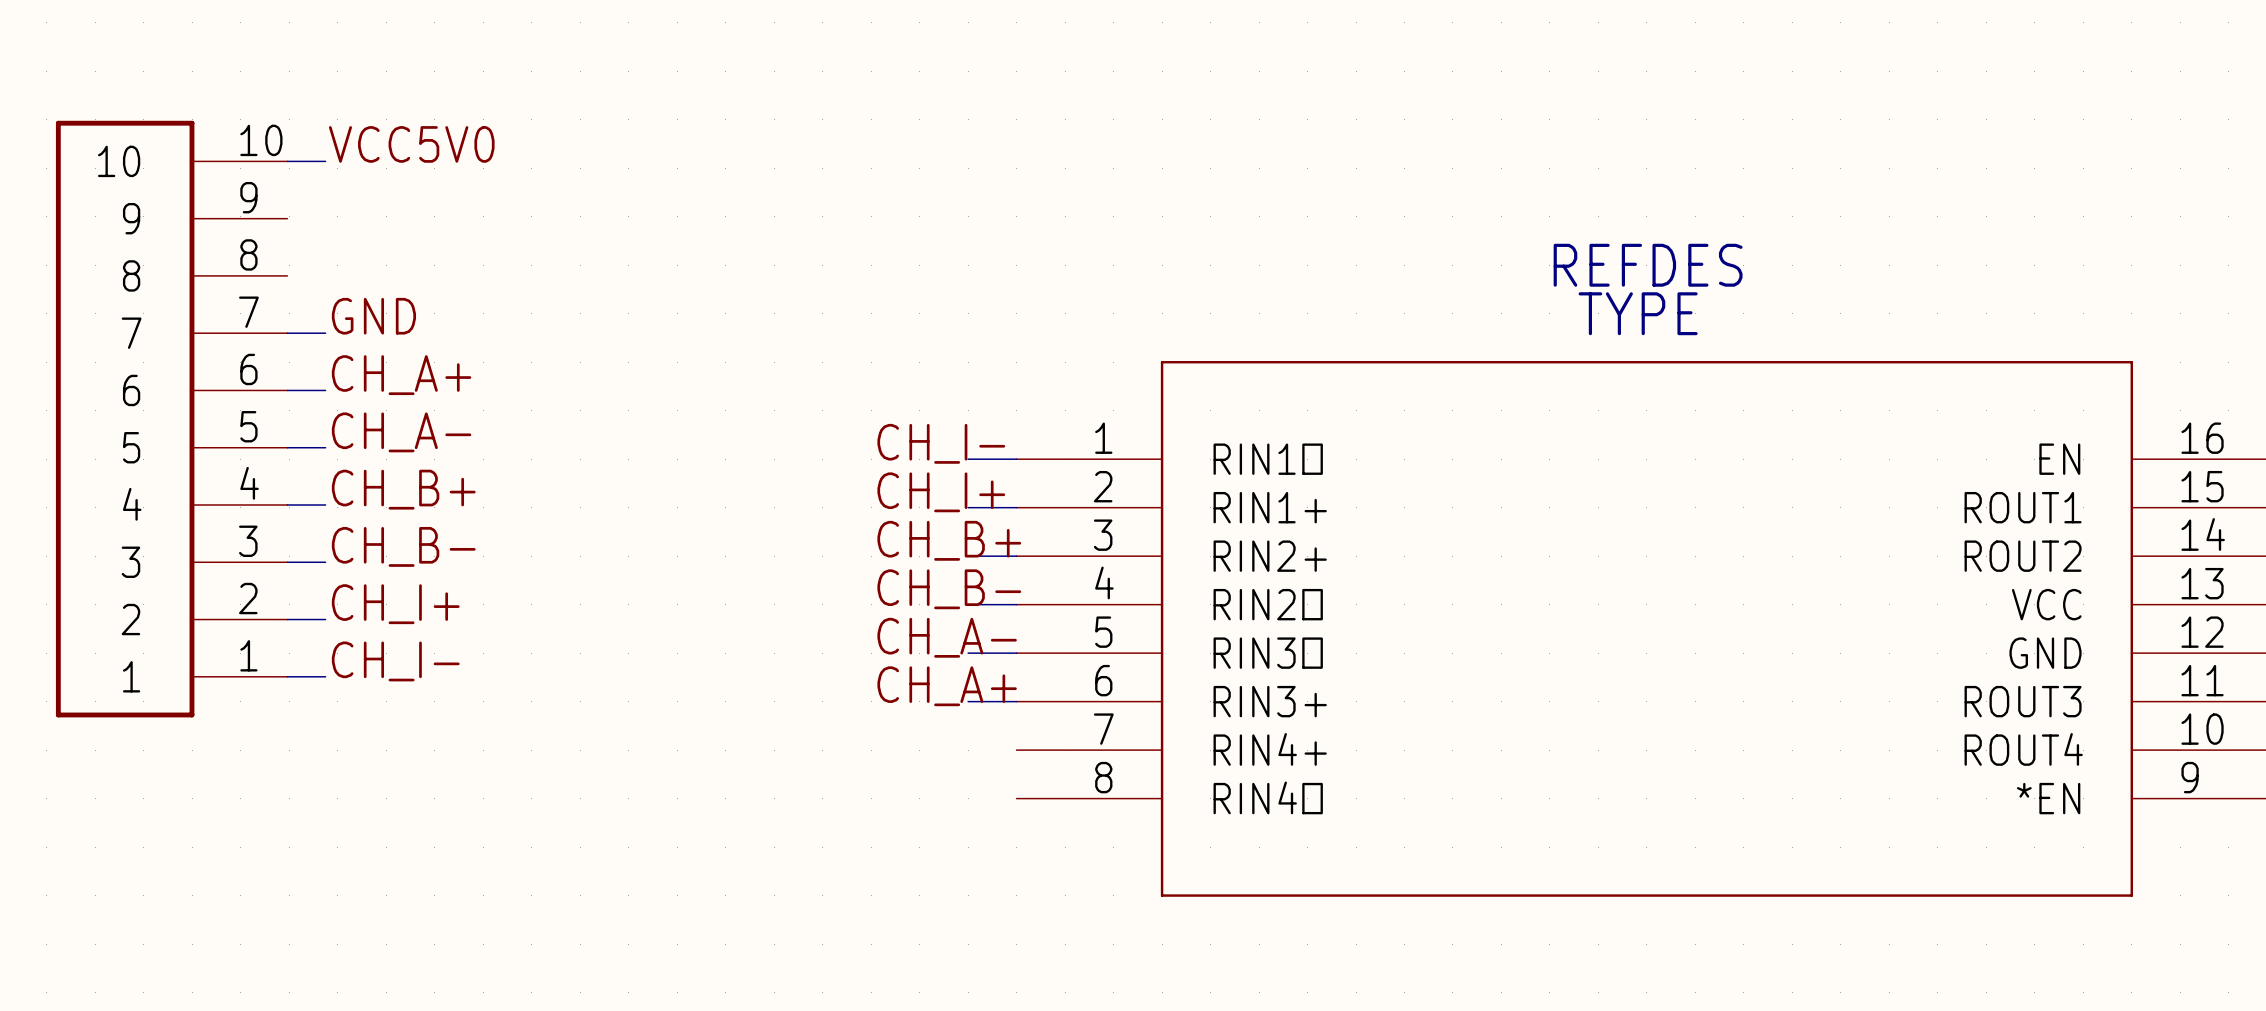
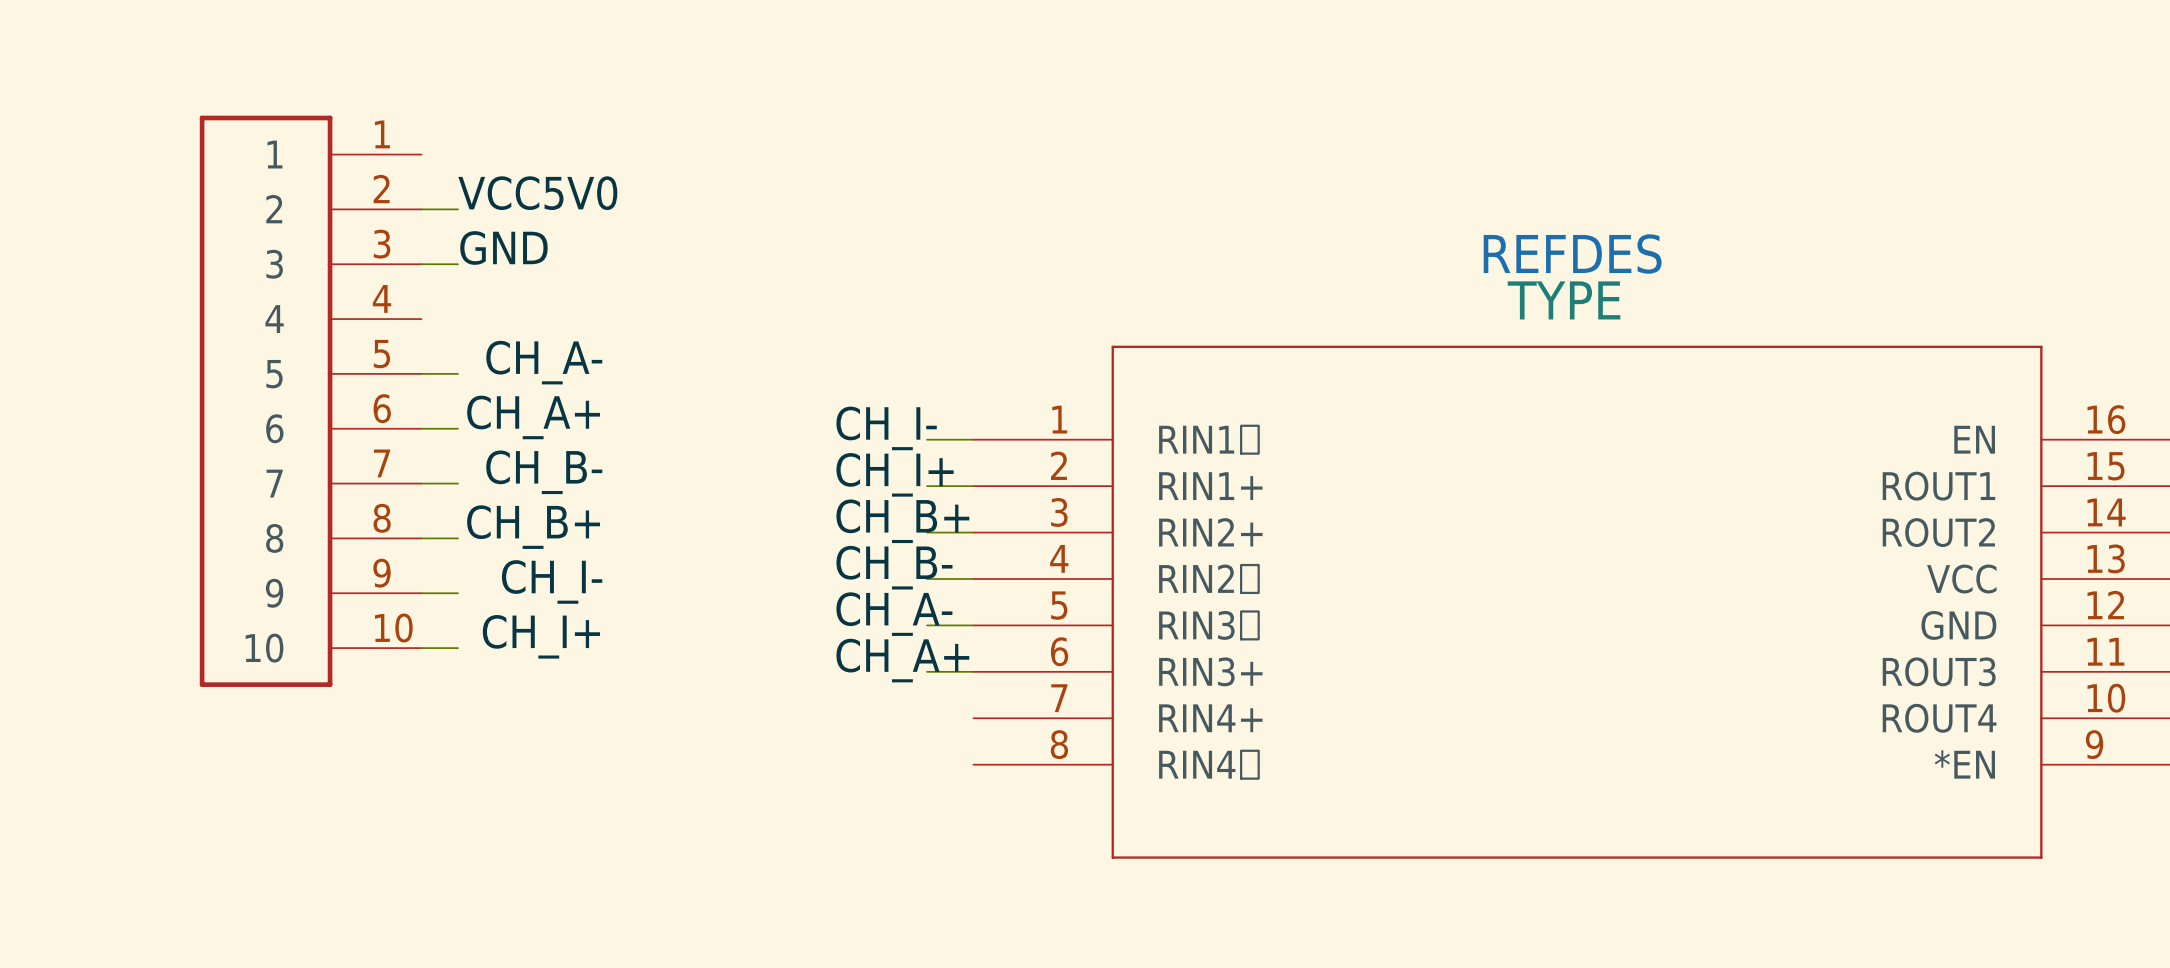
label position: VCC5V0 (411, 144) -> VCC5V0 (537, 193)
wire: (287, 161) (325, 161) -> (421, 209) (458, 209)
label position: GND (373, 316) -> GND (503, 248)
wire: (287, 333) (325, 333) -> (421, 373) (458, 373)
label position: CH_A+ (401, 375) -> CH_A+ (533, 417)
wire: (287, 390) (325, 390) -> (421, 428) (458, 428)
part: (171, 419) -> none
part: none -> (310, 401)
label position: CH_A- (401, 432) -> CH_A- (544, 362)
wire: (287, 447) (325, 447) -> (421, 483) (458, 483)
label position: CH_B+ (403, 489) -> CH_B+ (533, 527)
wire: (287, 505) (325, 505) -> (421, 538) (458, 538)
label position: CH_B- (403, 546) -> CH_B- (544, 472)
wire: (287, 562) (325, 562) -> (421, 593) (458, 593)
label position: CH_I+ (395, 604) -> CH_I+ (541, 636)
wire: (287, 619) (325, 619) -> (421, 648) (458, 648)
label position: CH_I- (395, 661) -> CH_I- (552, 581)
wire: (287, 676) (325, 676) -> (421, 264) (458, 264)

